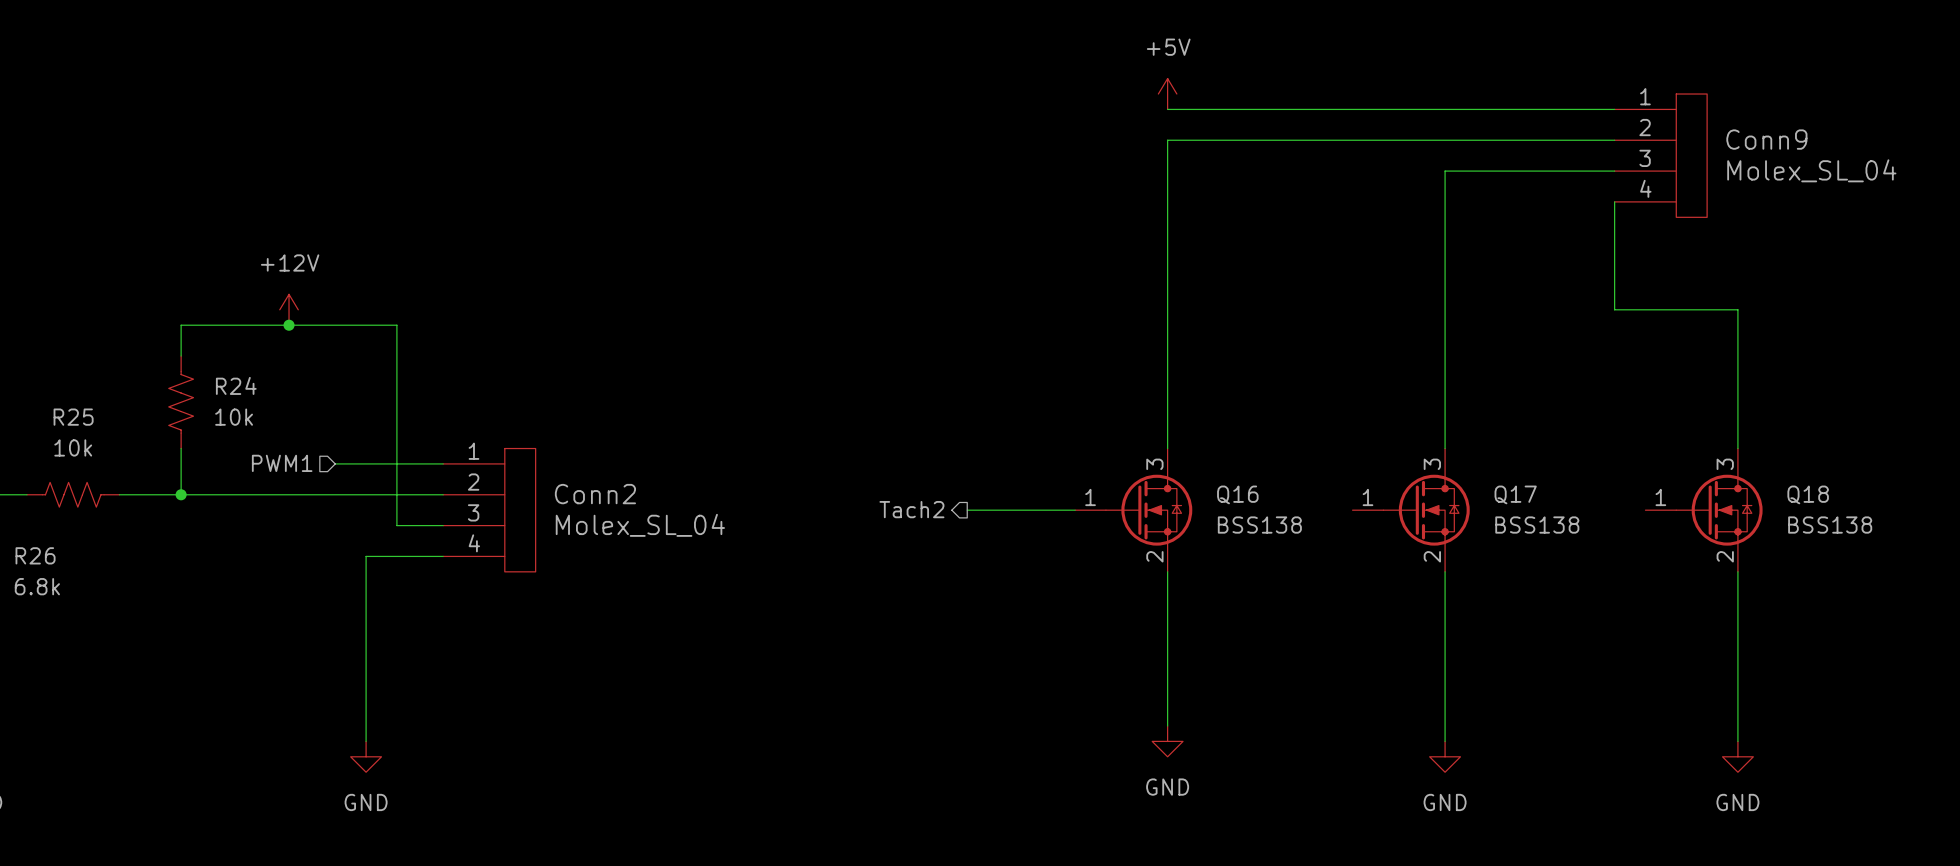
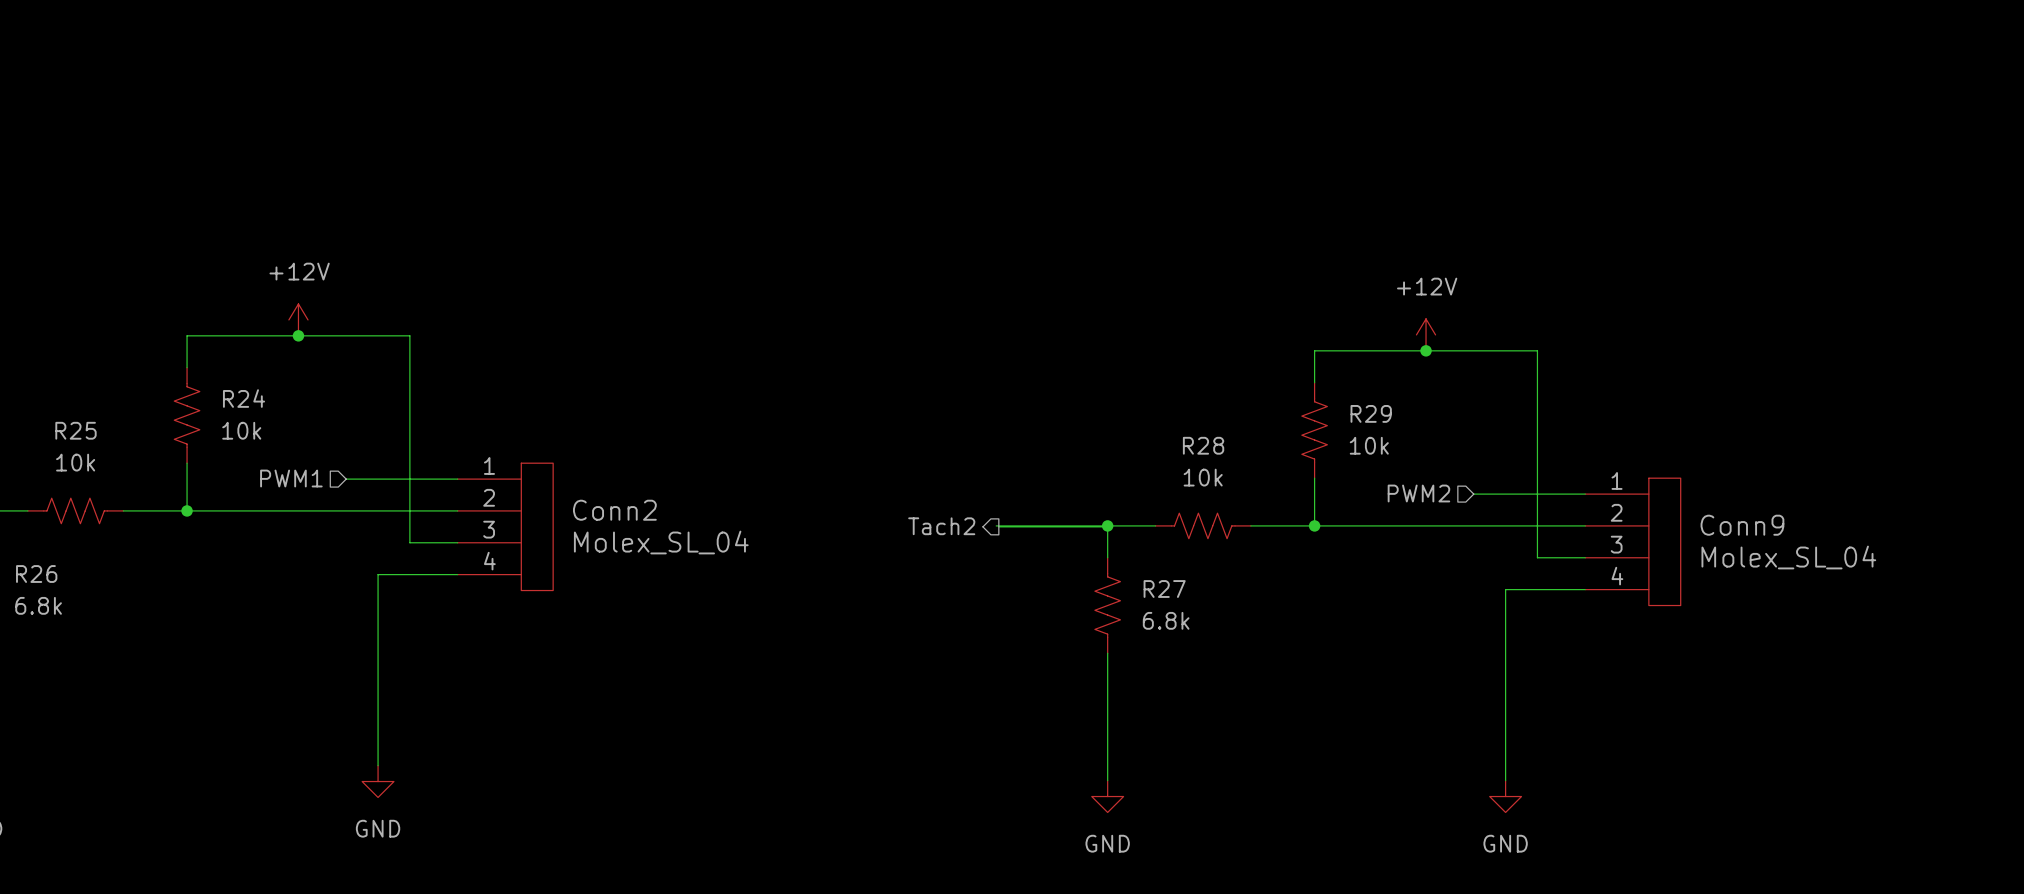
power symbol: +5V (1167, 94) -> none
wire: (1167, 109) (1614, 109) -> none
wire: (1614, 140) (1167, 140) (1167, 448) -> none
Conn9 position: (1660, 155) -> (1632, 541)
wire: (1614, 171) (1445, 171) (1445, 448) -> none
wire: (1614, 201) (1614, 309) (1737, 309) (1737, 448) -> none
power symbol: none -> +12V (1426, 334)
junction: none -> (1426, 350)
wire: none -> (1314, 382) (1314, 350) (1537, 350) (1537, 557) (1585, 557)
R29: none -> 10k (1314, 430)
wire: none -> (1314, 478) (1314, 525)
hierarchical label: none -> PWM2 (1418, 493)
wire: none -> (1473, 494) (1585, 494)
wire: none -> (996, 525) (1155, 525)
wire: none -> (1107, 525) (1107, 557)
junction: none -> (1107, 525)
R28: none -> 10k (1203, 525)
wire: none -> (1250, 525) (1585, 525)
junction: none -> (1314, 525)
Q16: BSS138 (1133, 510) -> none
Q17: BSS138 (1411, 510) -> none
Q18: BSS138 (1704, 510) -> none
wire: none -> (1585, 589) (1505, 589) (1505, 780)
wire: (1167, 571) (1167, 725) -> none
wire: (1445, 571) (1445, 741) -> none
wire: (1737, 571) (1737, 741) -> none
R27: none -> 6.8k (1107, 605)
wire: none -> (1107, 653) (1107, 780)
power symbol position: GND (1167, 741) -> GND (1107, 796)
power symbol position: GND (1445, 756) -> GND (1505, 796)
power symbol: GND (1737, 756) -> none

